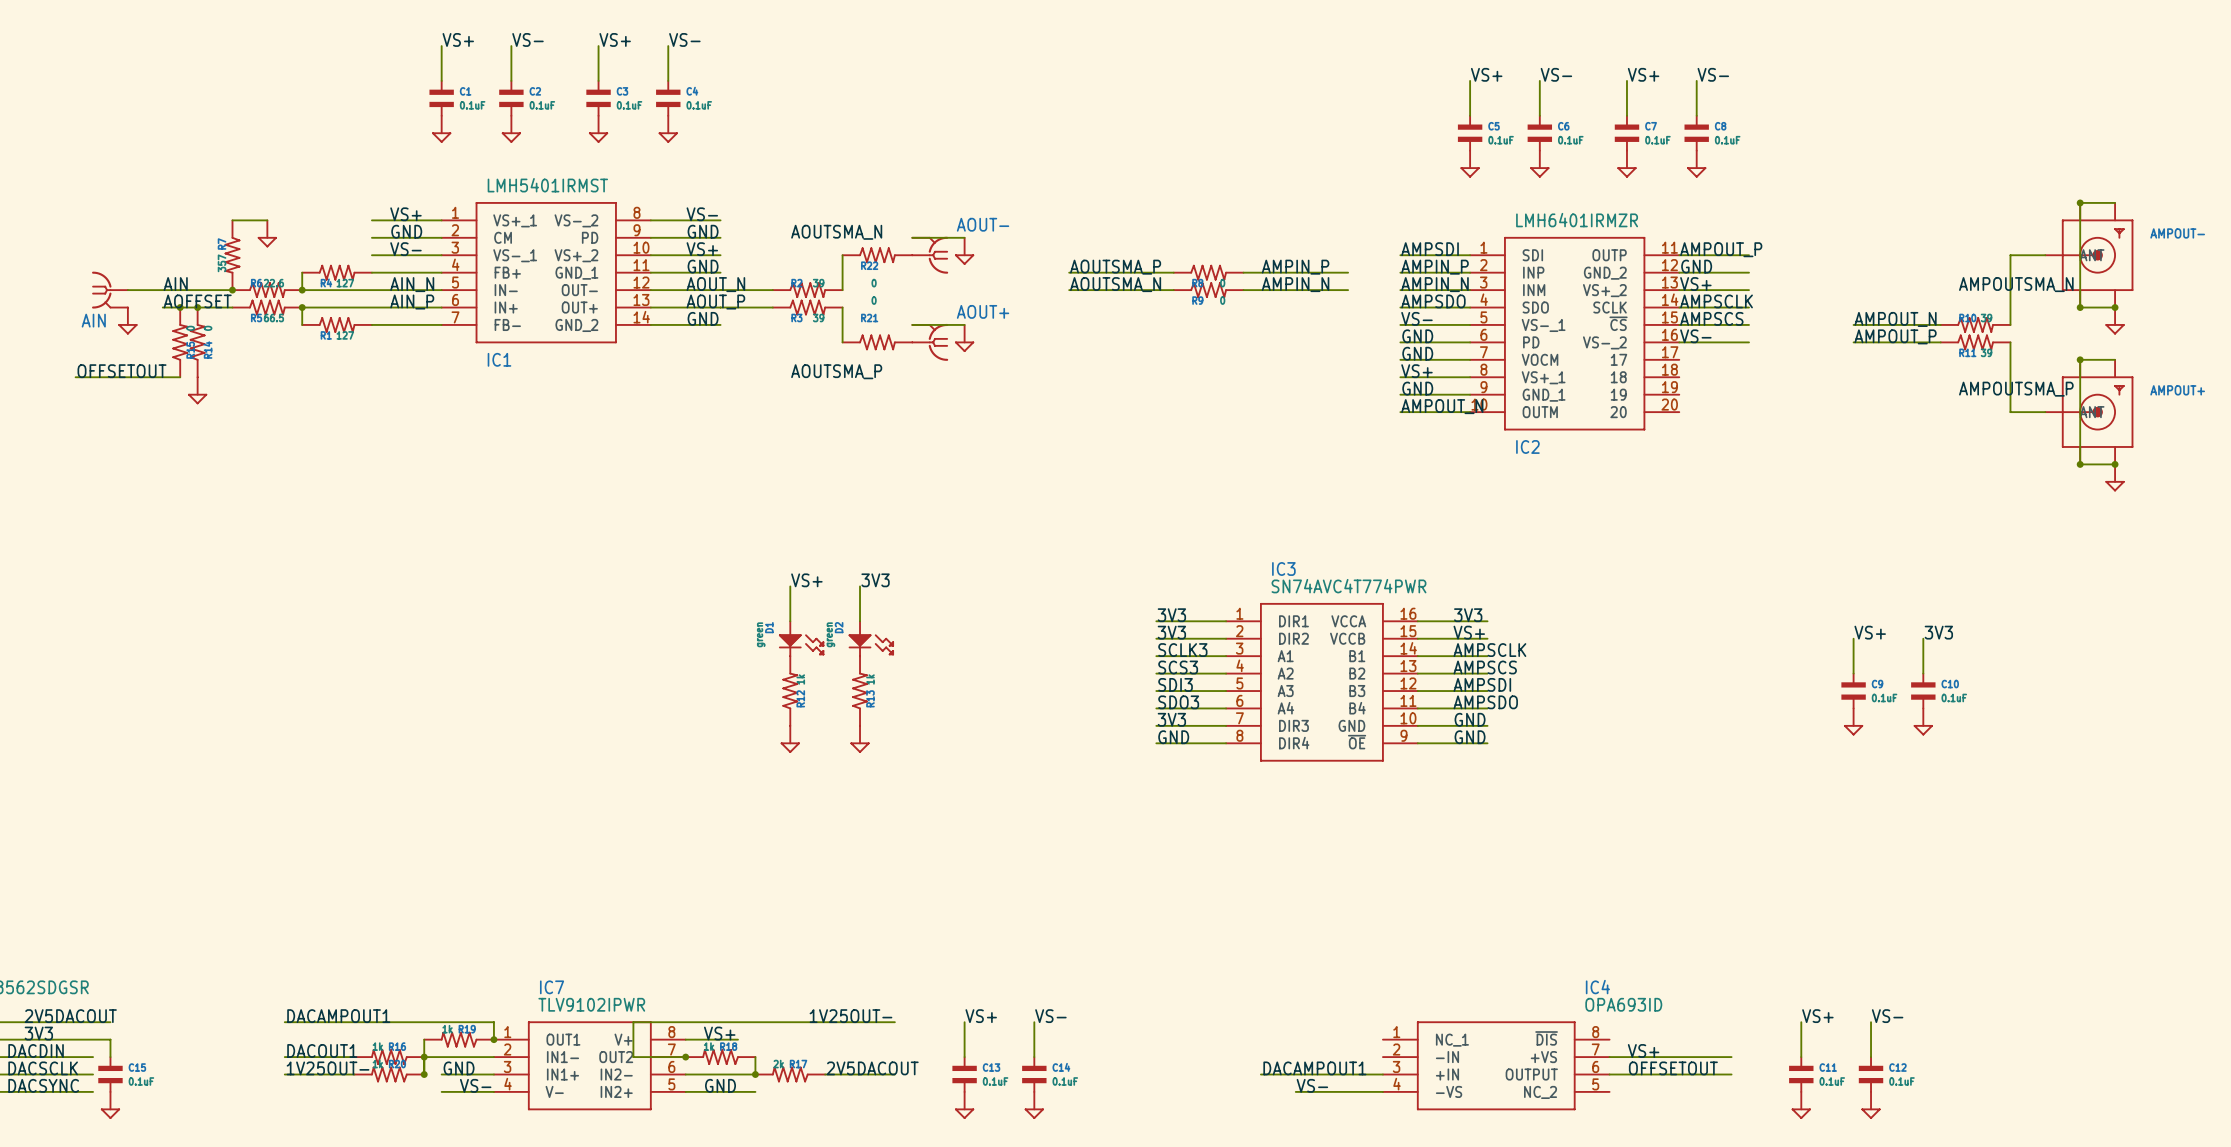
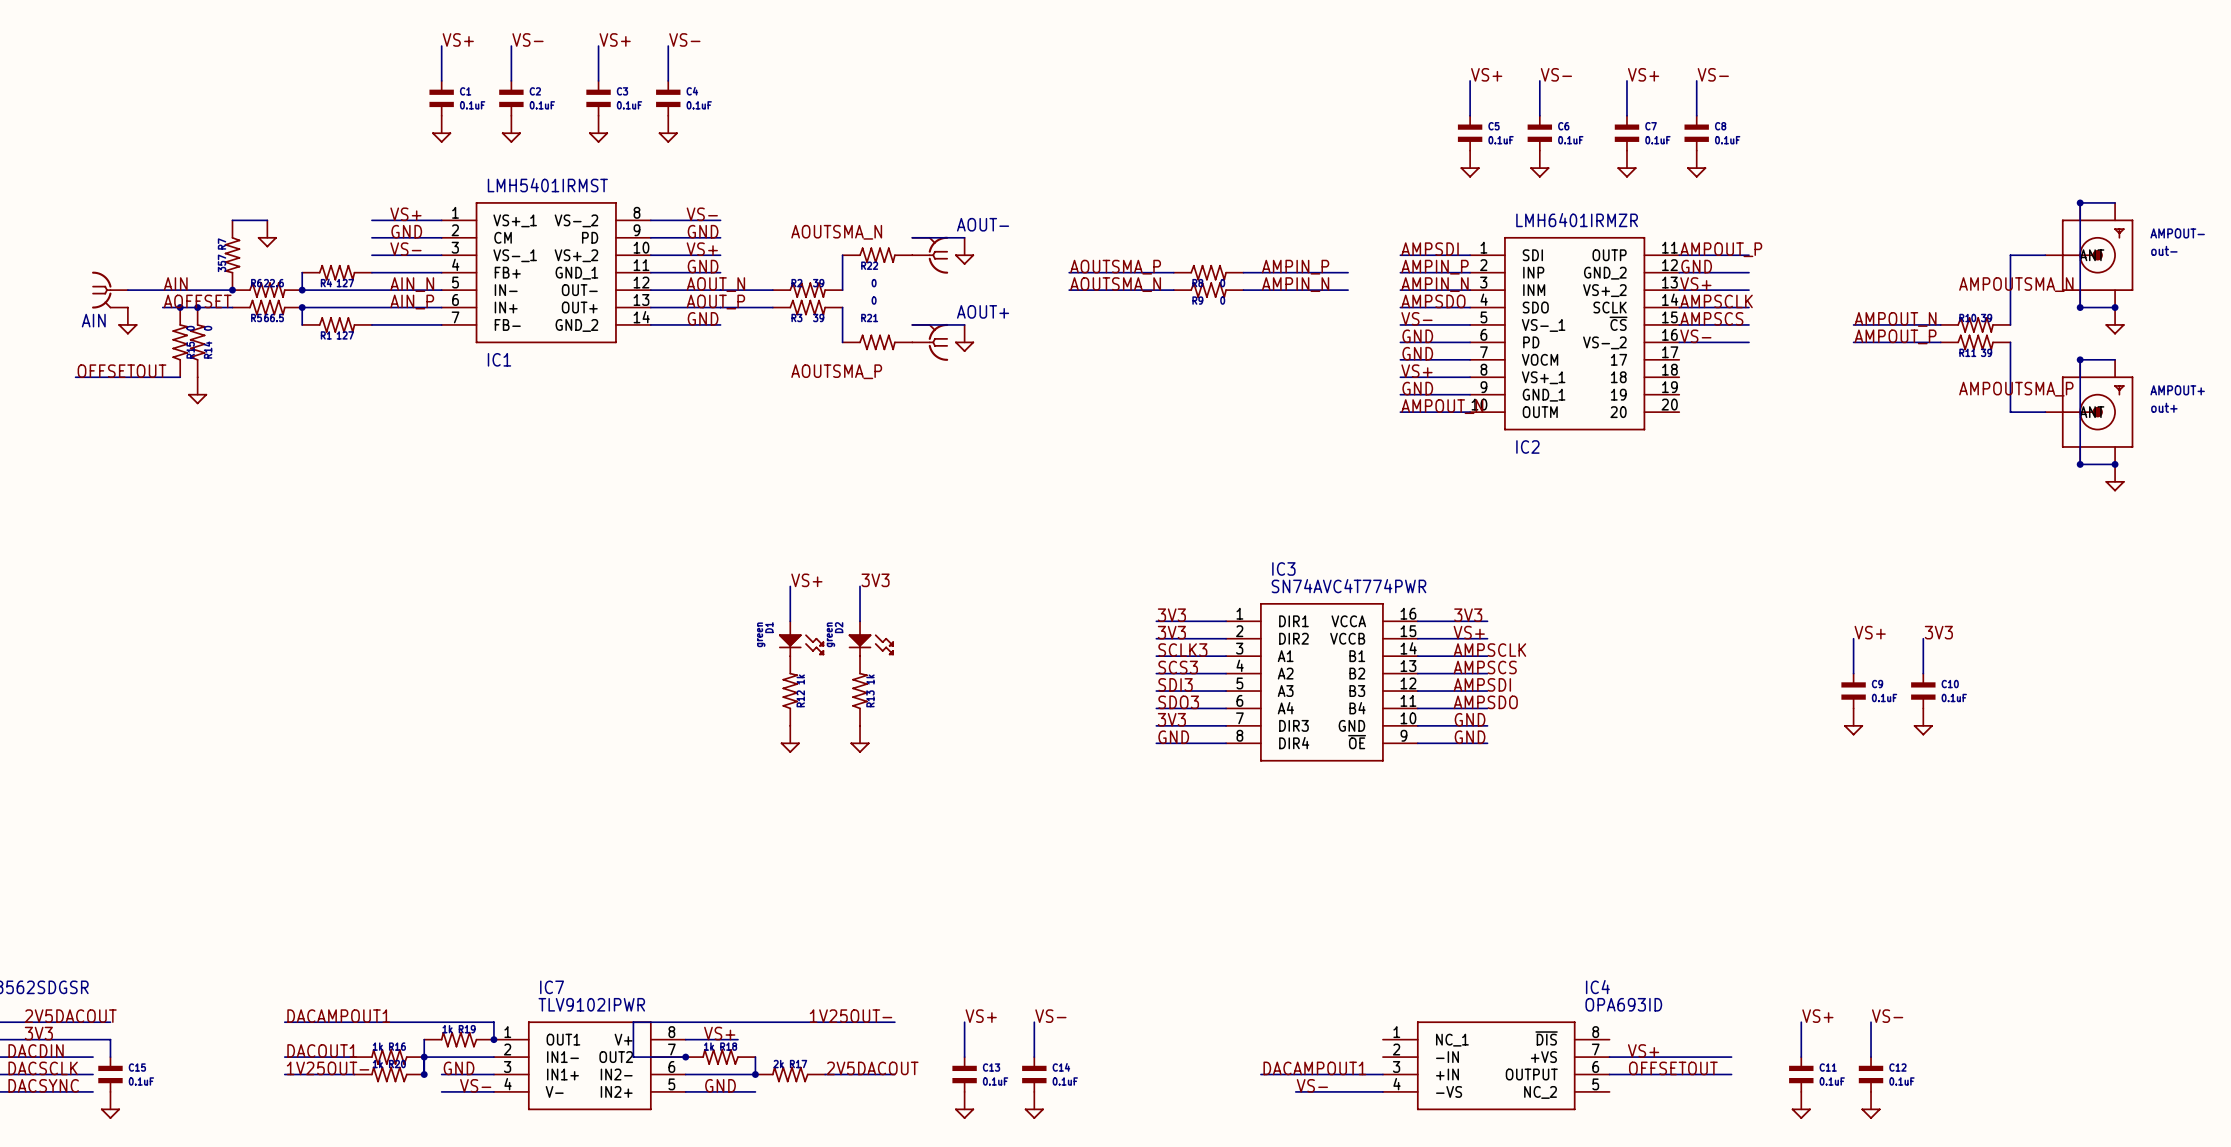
AMPOUT- value: none -> out- (2164, 250)
AMPOUT+ value: none -> out+ (2164, 407)

